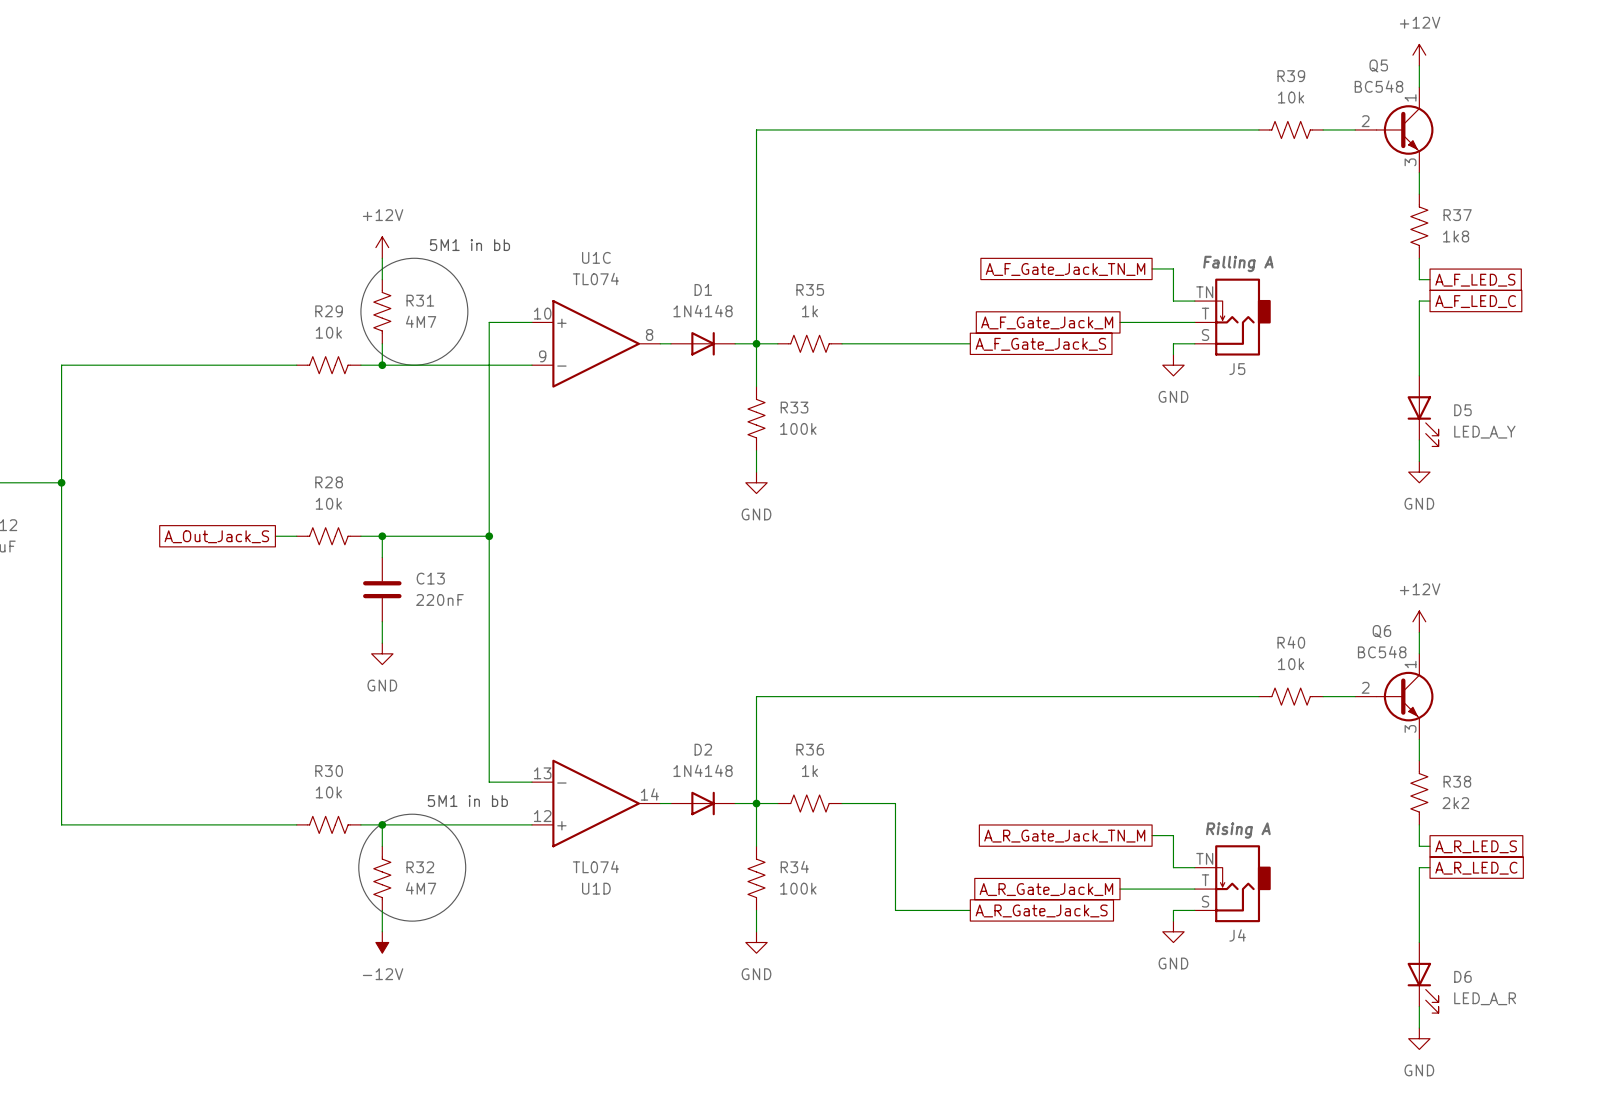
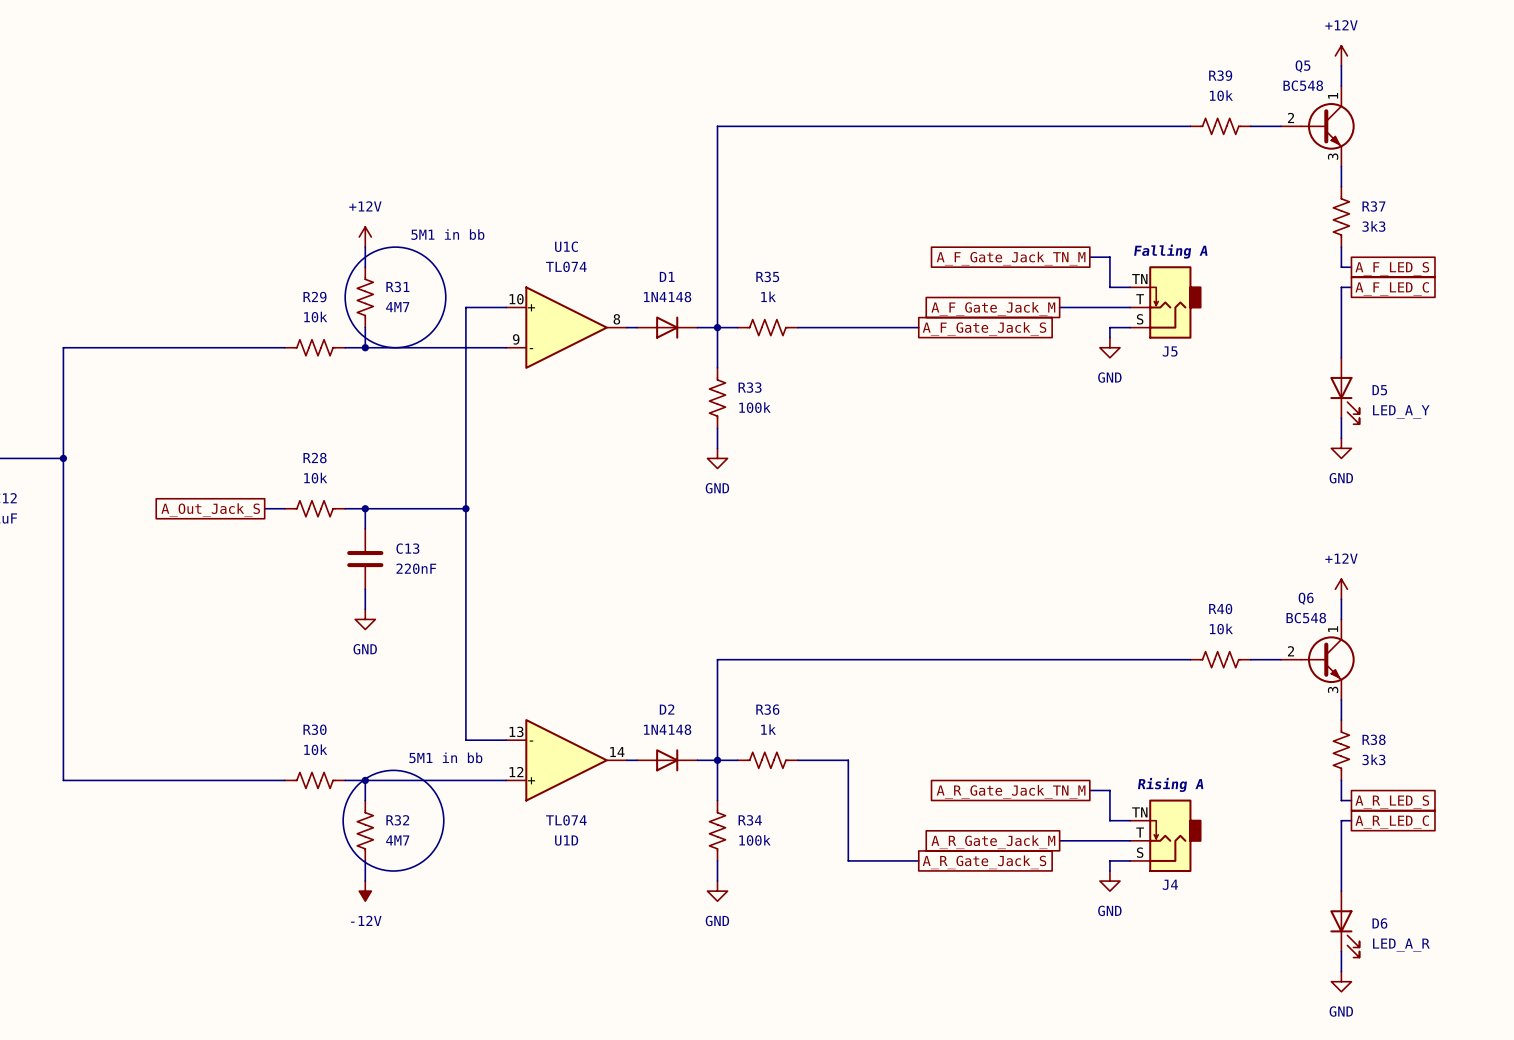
R37 value: 1k8 (1456, 236) -> 3k3 (1373, 226)
R38 value: 2k2 (1455, 803) -> 3k3 (1373, 759)

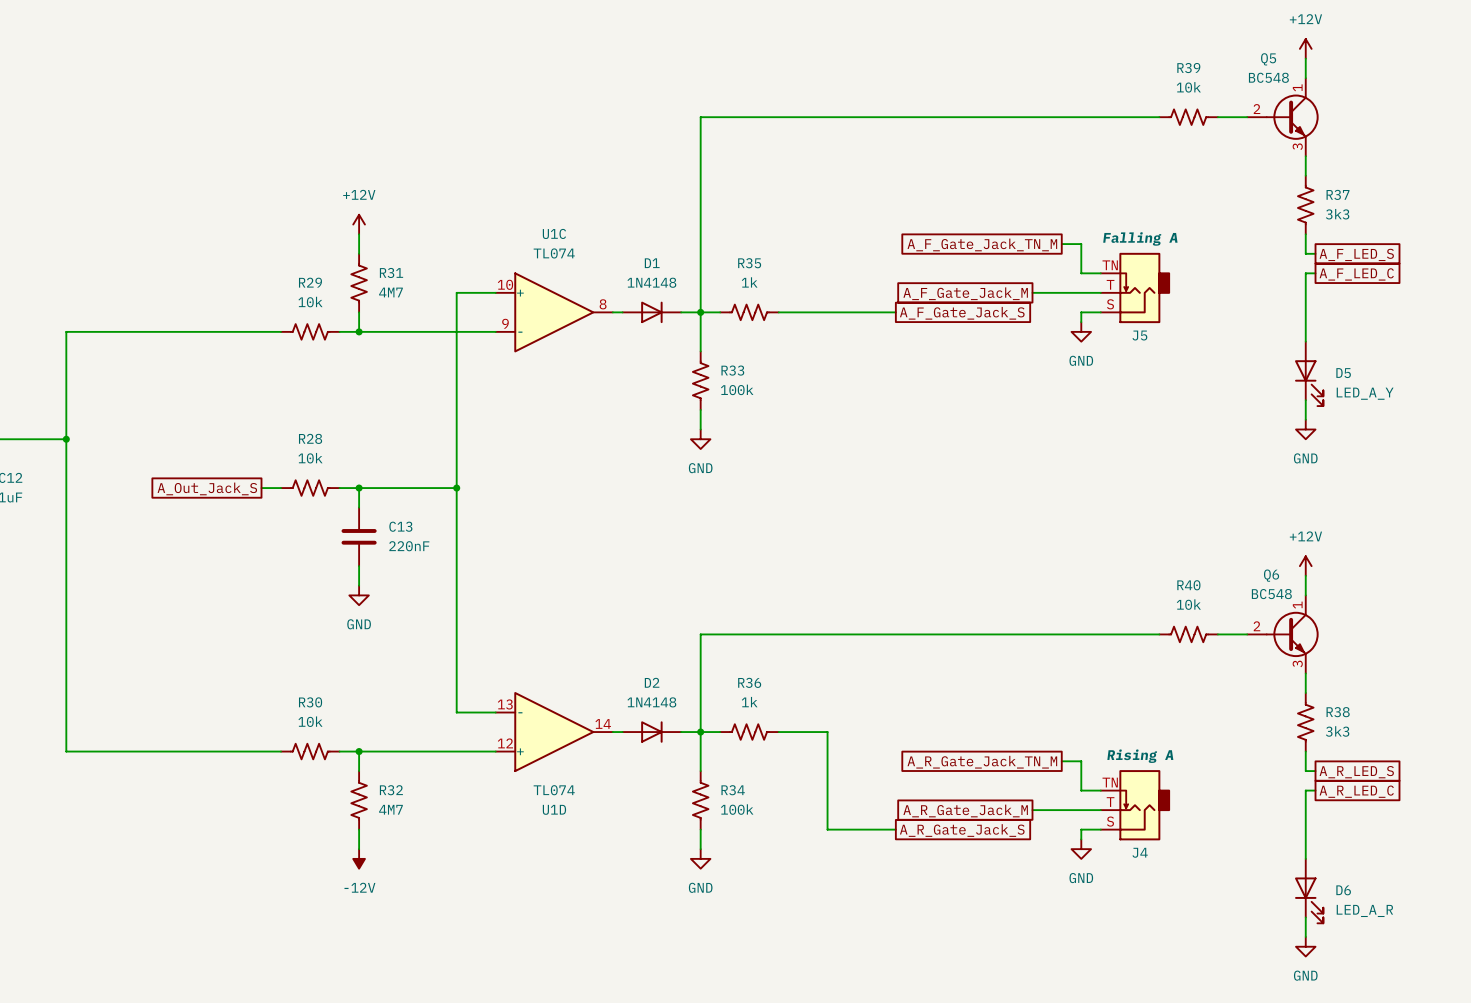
text: 5M1 in bb (447, 234) -> none
drawing: [345, 247, 446, 348] -> none
text: 5M1 in bb (445, 757) -> none
drawing: [343, 770, 444, 872] -> none

